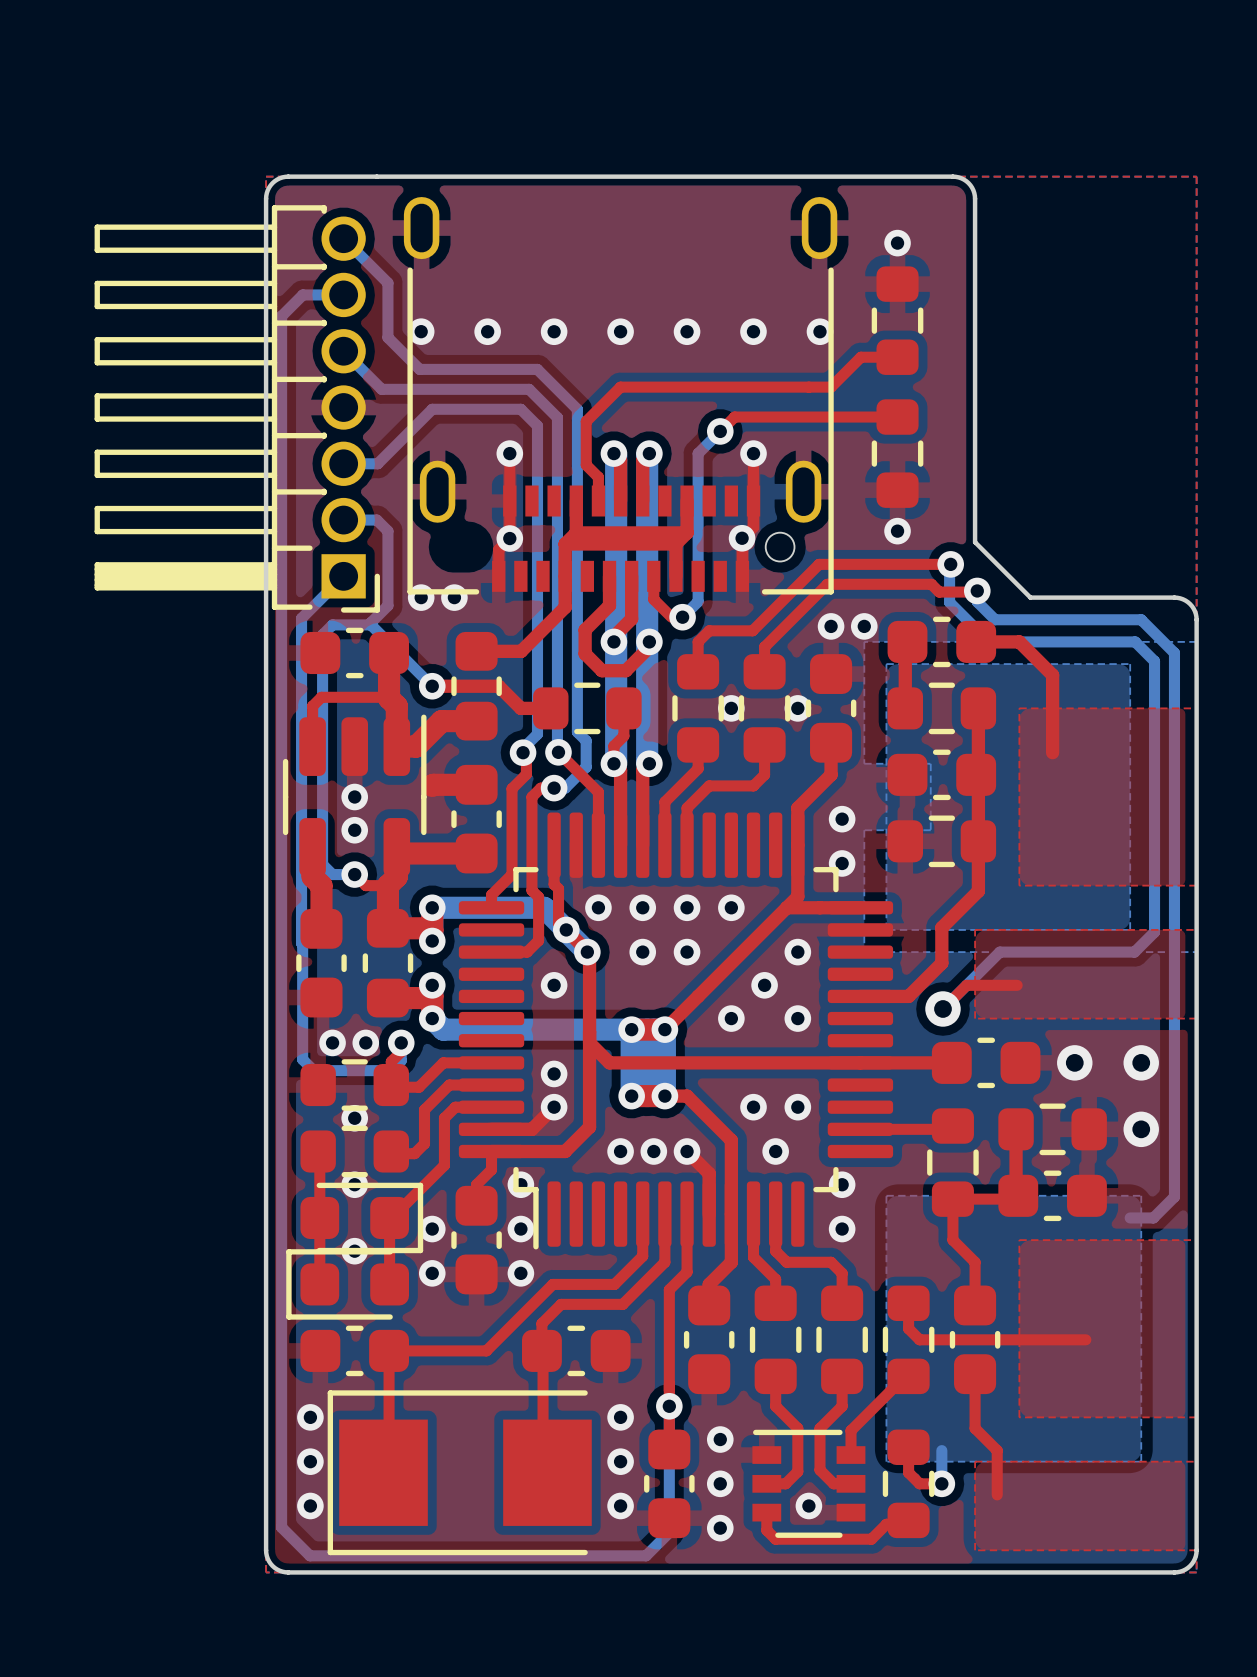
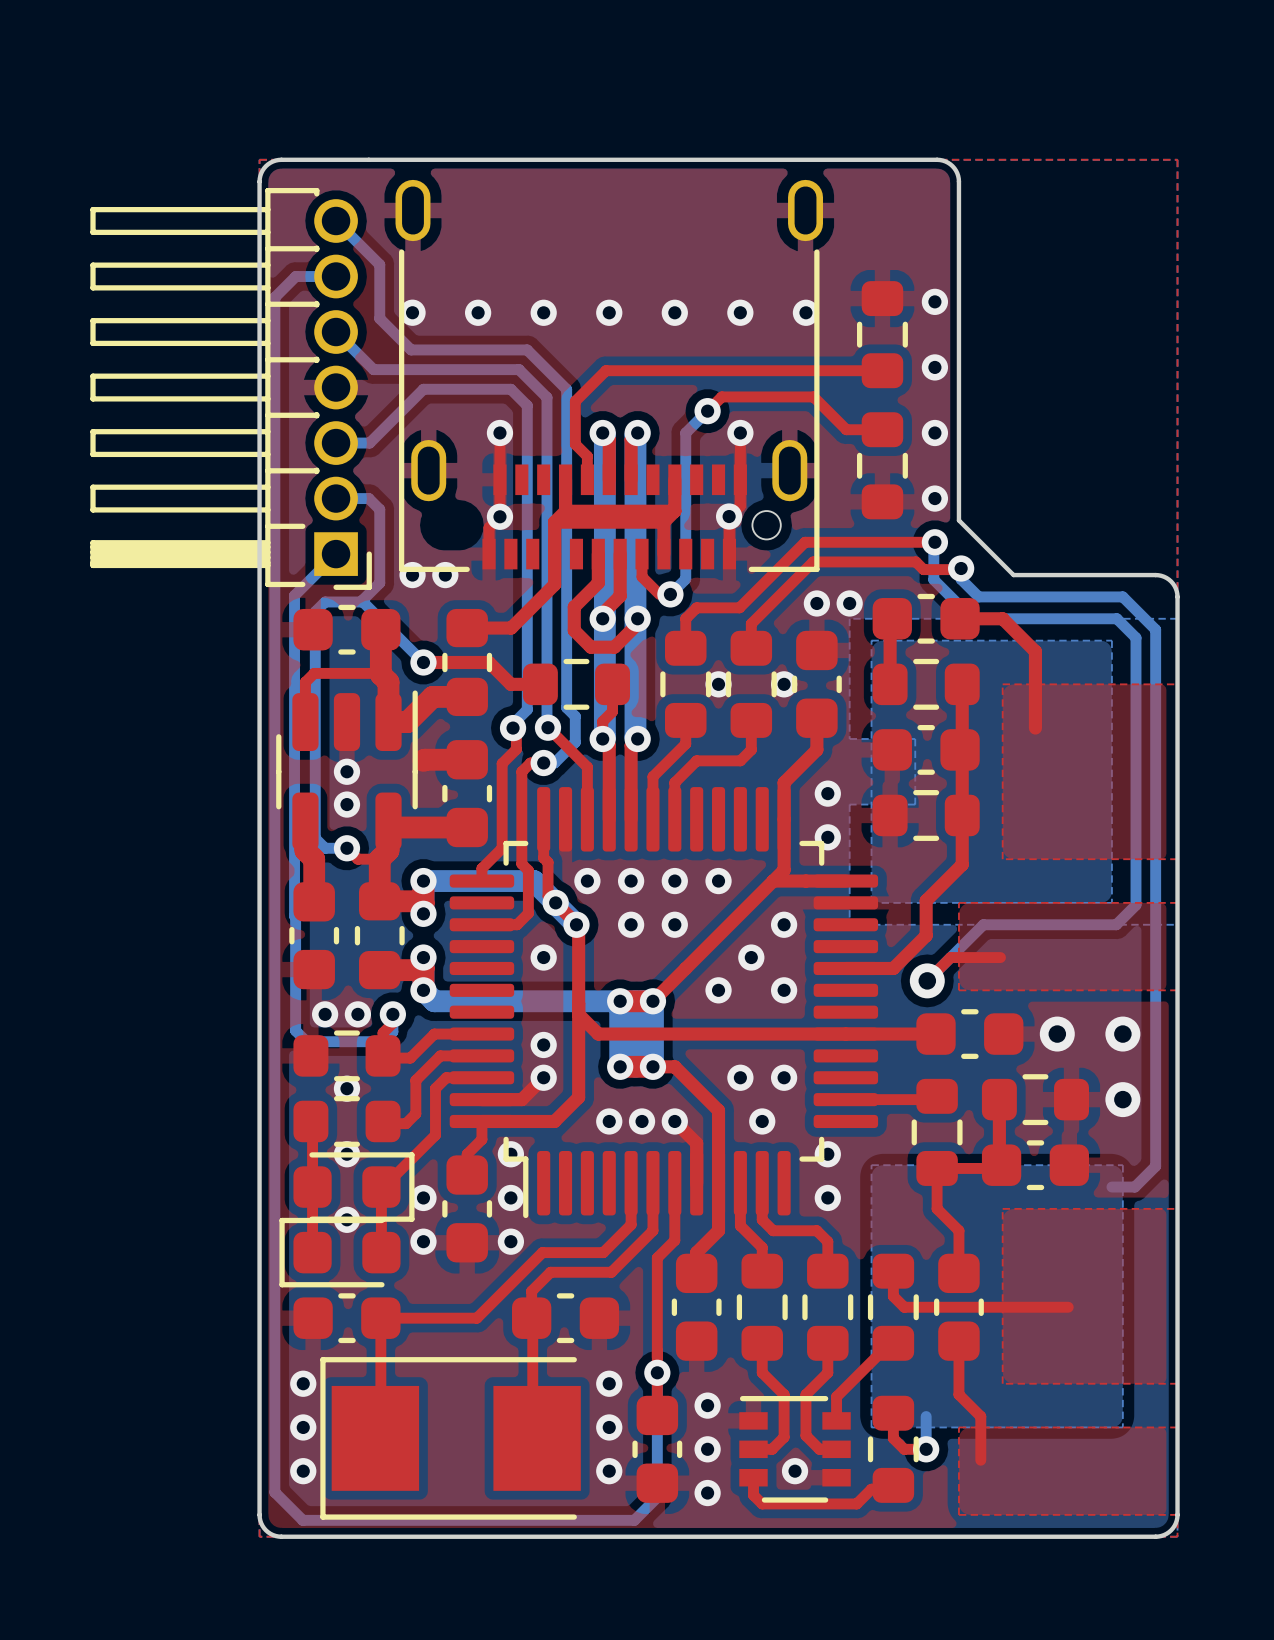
via: (897, 243) -> none
part position: (897, 320) -> (882, 334)
via: none -> (934, 301)
top track: (897, 357) (860, 357) (831, 387) (620, 387) (617, 390) -> (882, 370) (605, 370)
via: none -> (934, 367)
top track: (827, 417) (908, 417) -> (813, 396) (846, 429) (882, 429)
part position: (897, 453) -> (882, 465)
via: none -> (934, 433)
via: none -> (934, 498)
via: (897, 531) -> none

